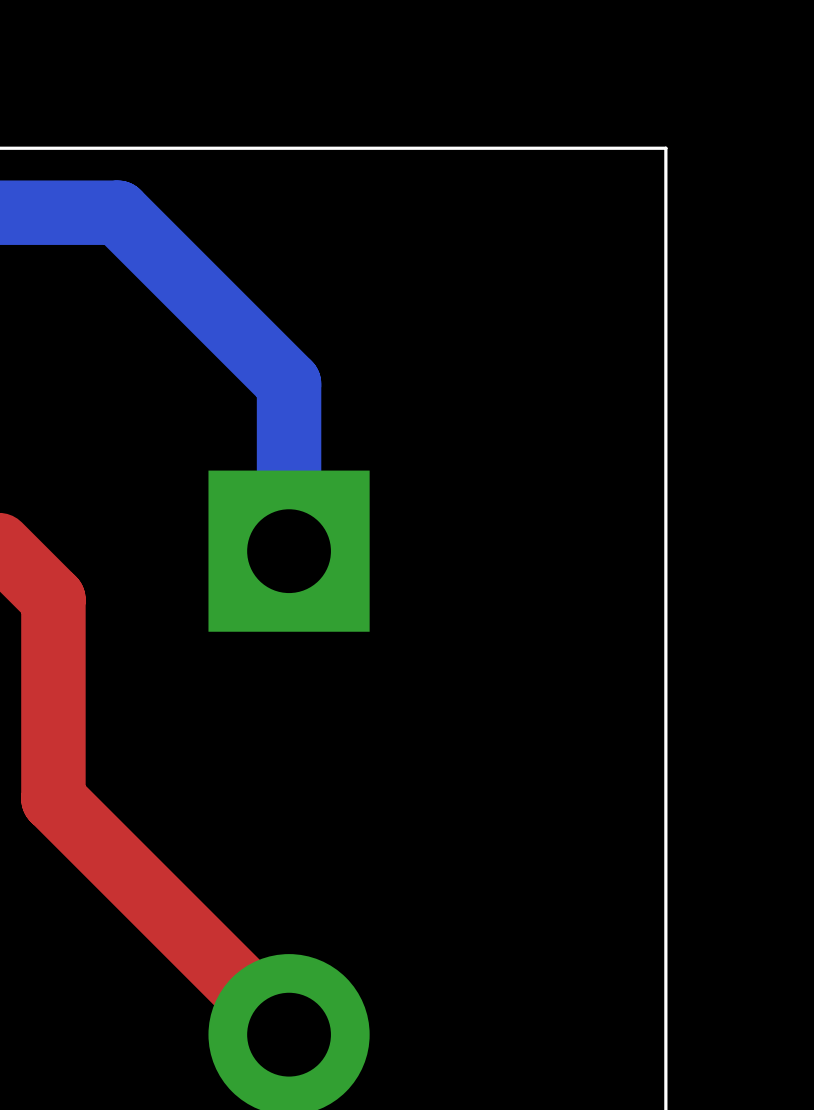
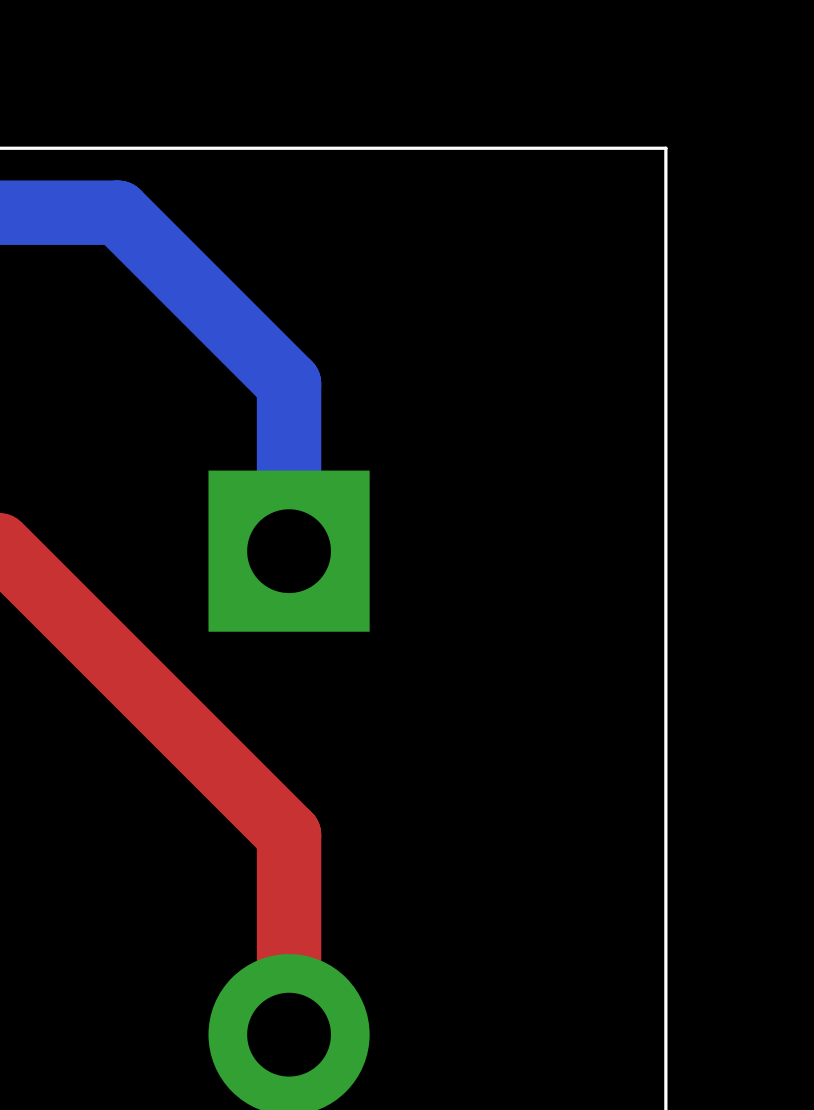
top track: (53, 599) (53, 799) (289, 1034) -> (53, 599) (289, 835) (289, 1034)

